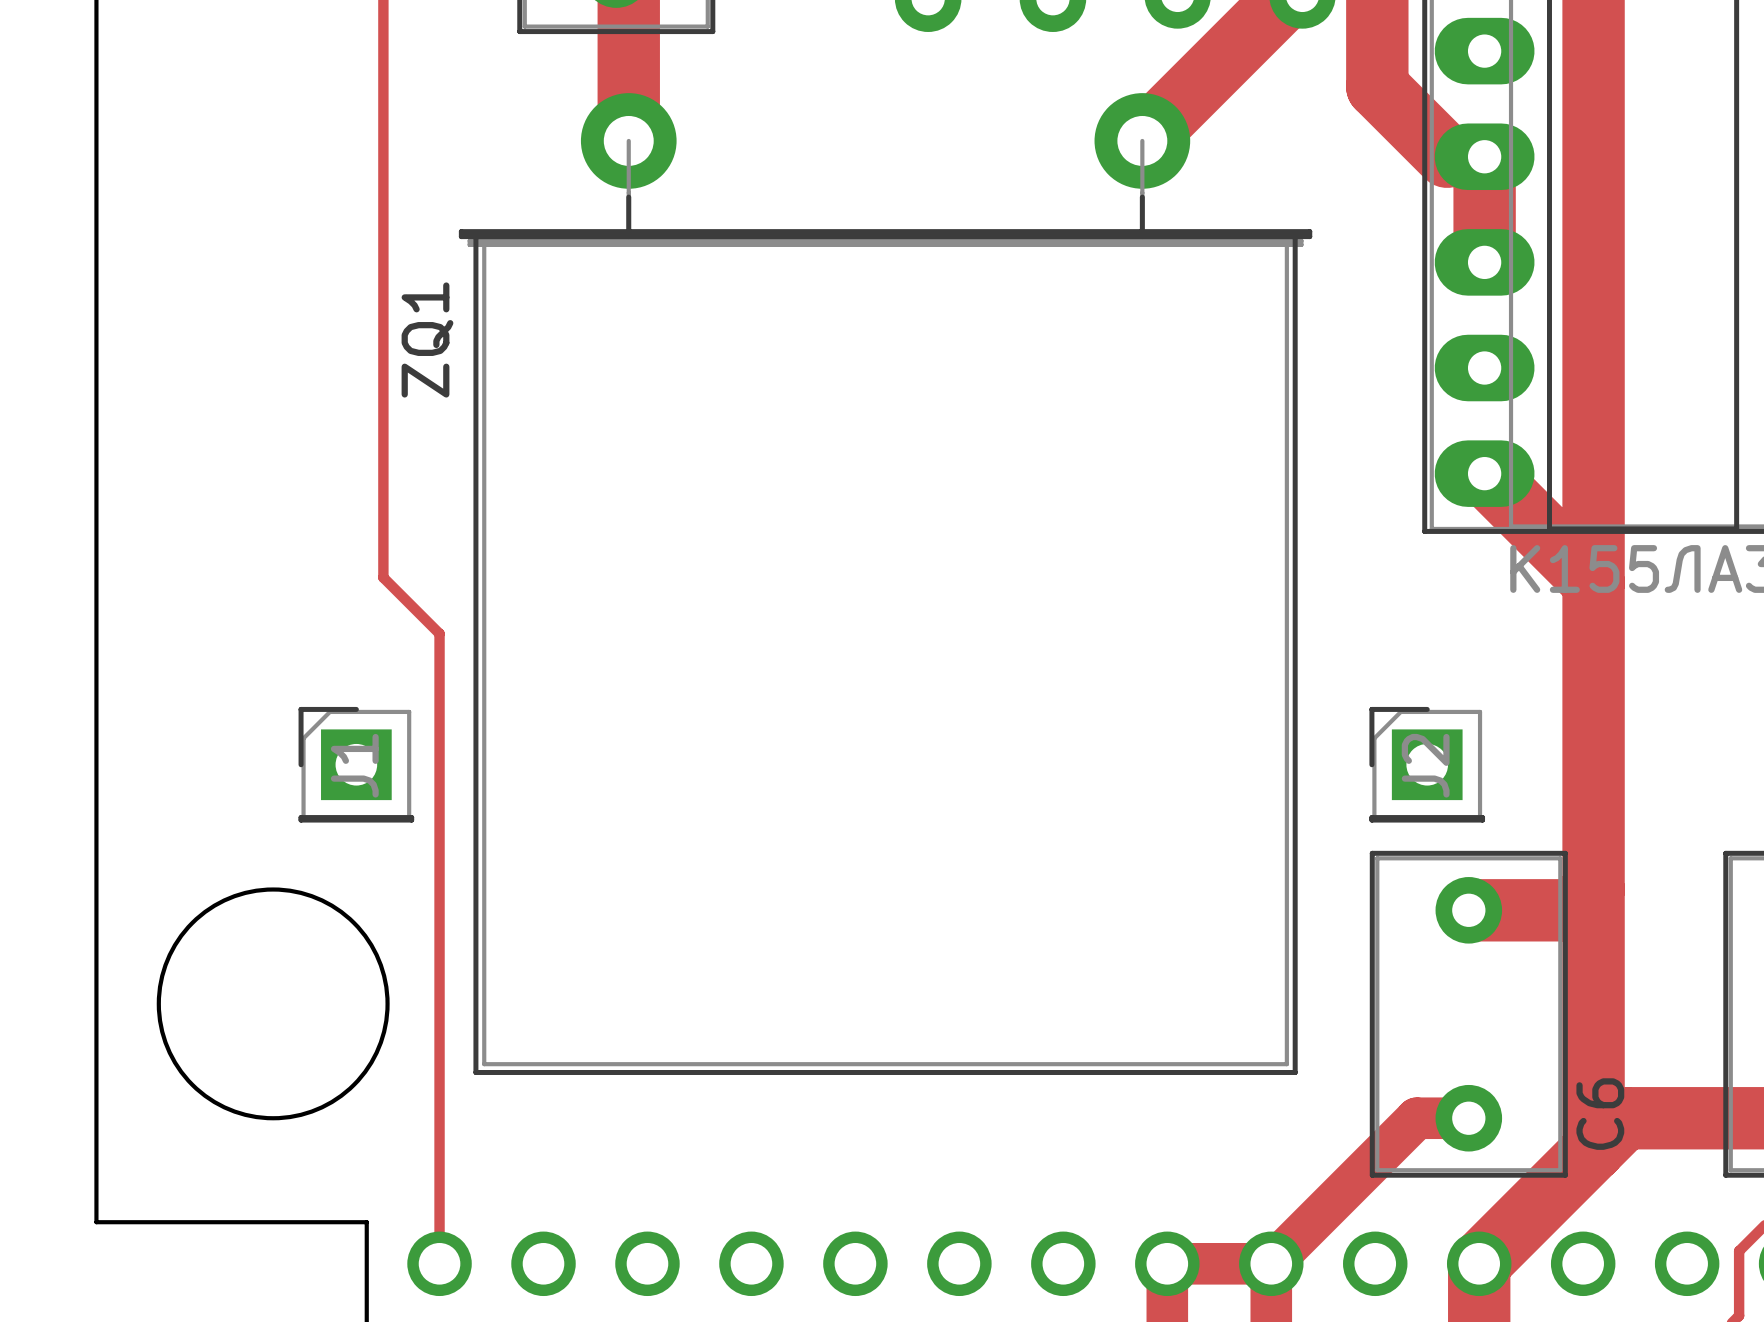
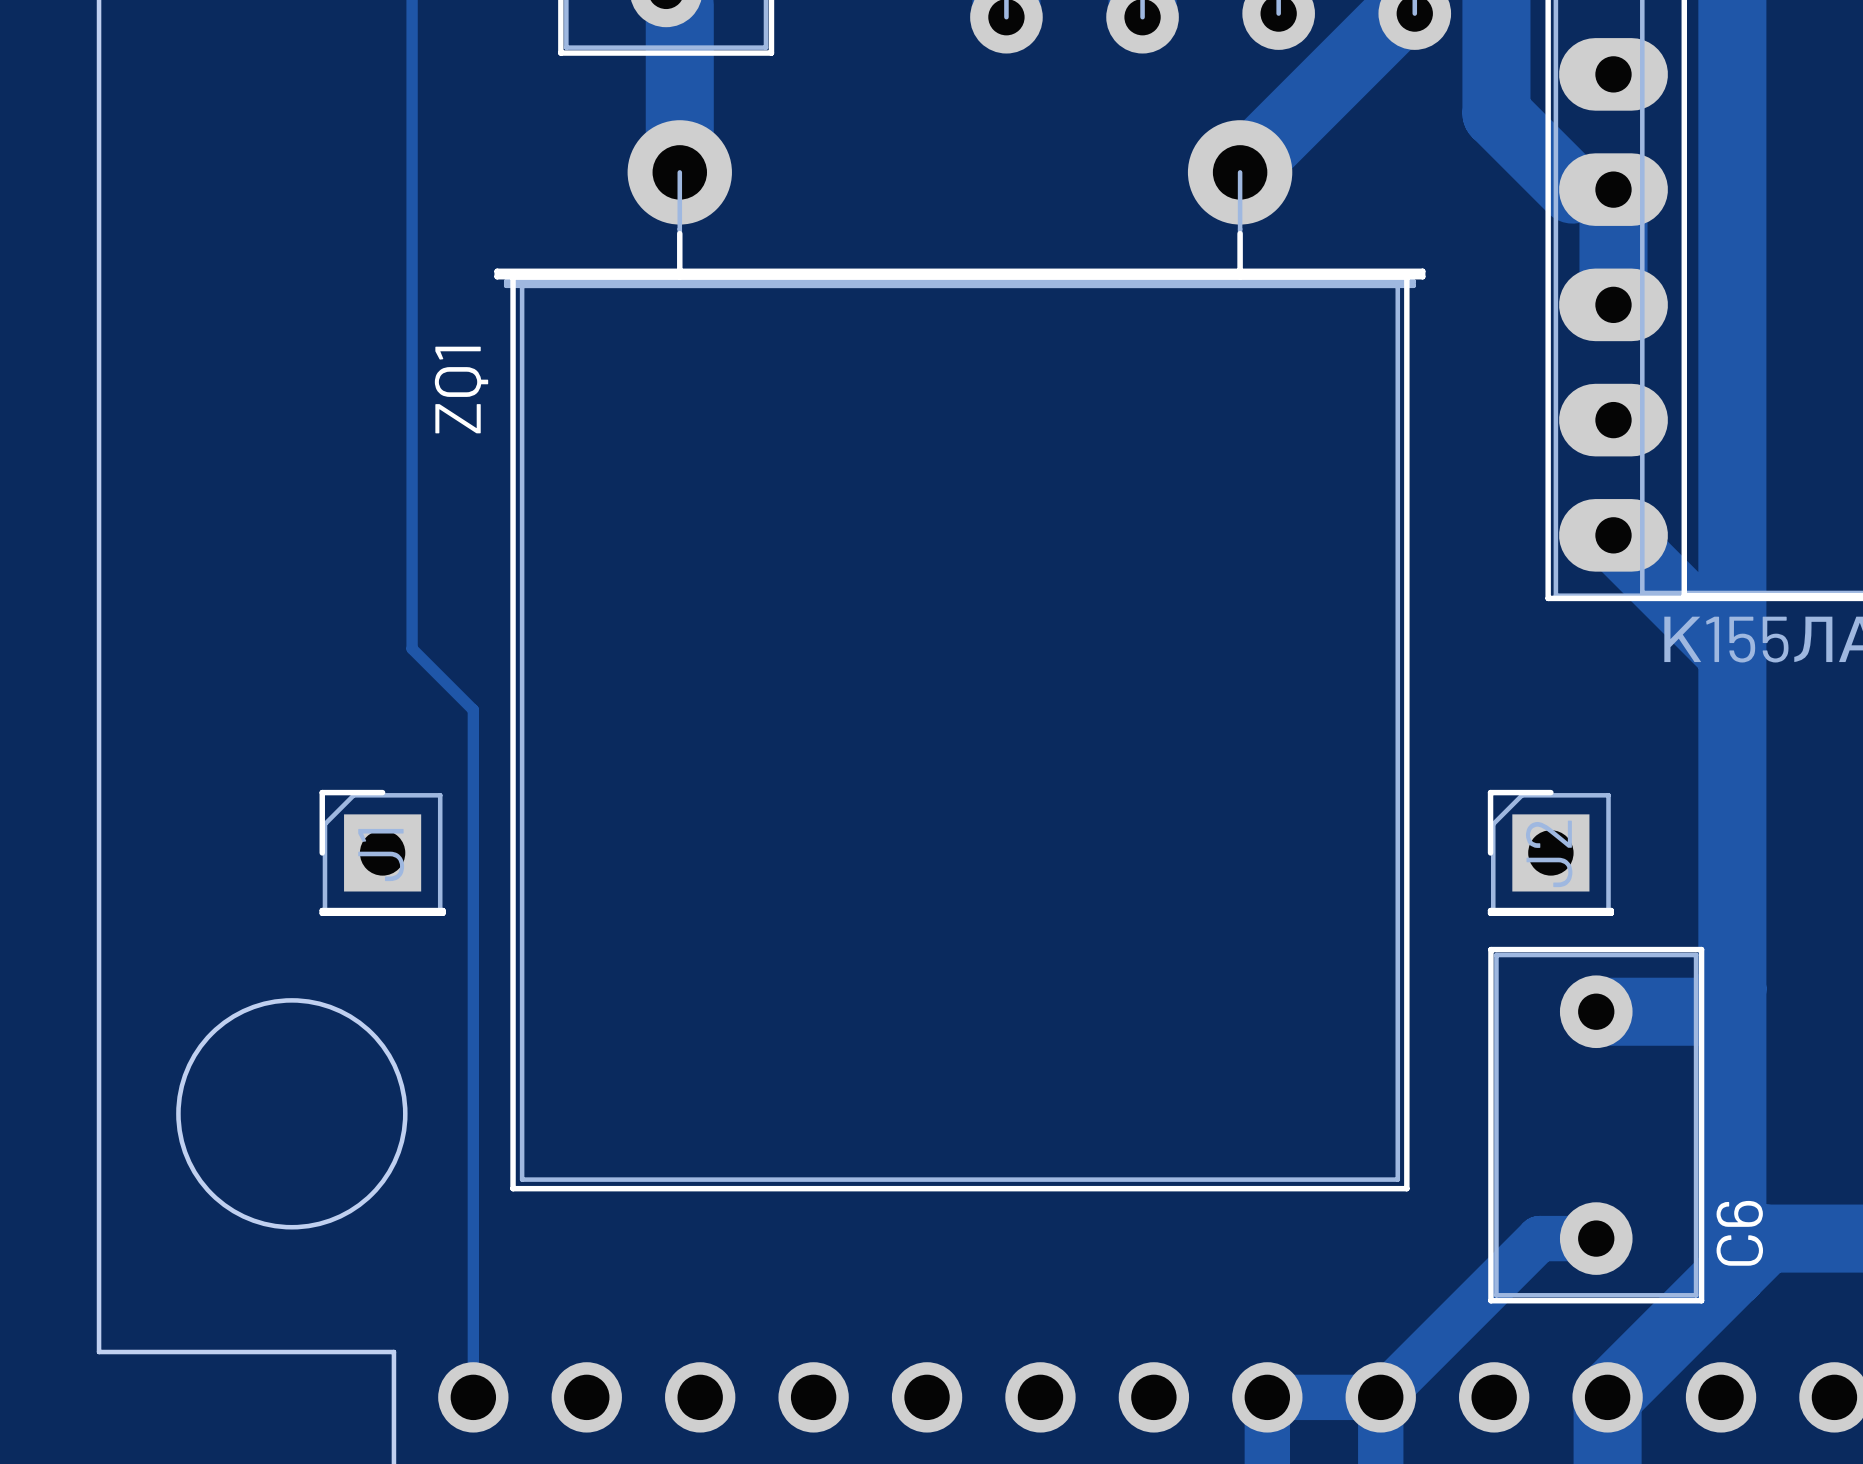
round board edge size: [156, 887, 390, 1121] -> [176, 998, 408, 1230]

